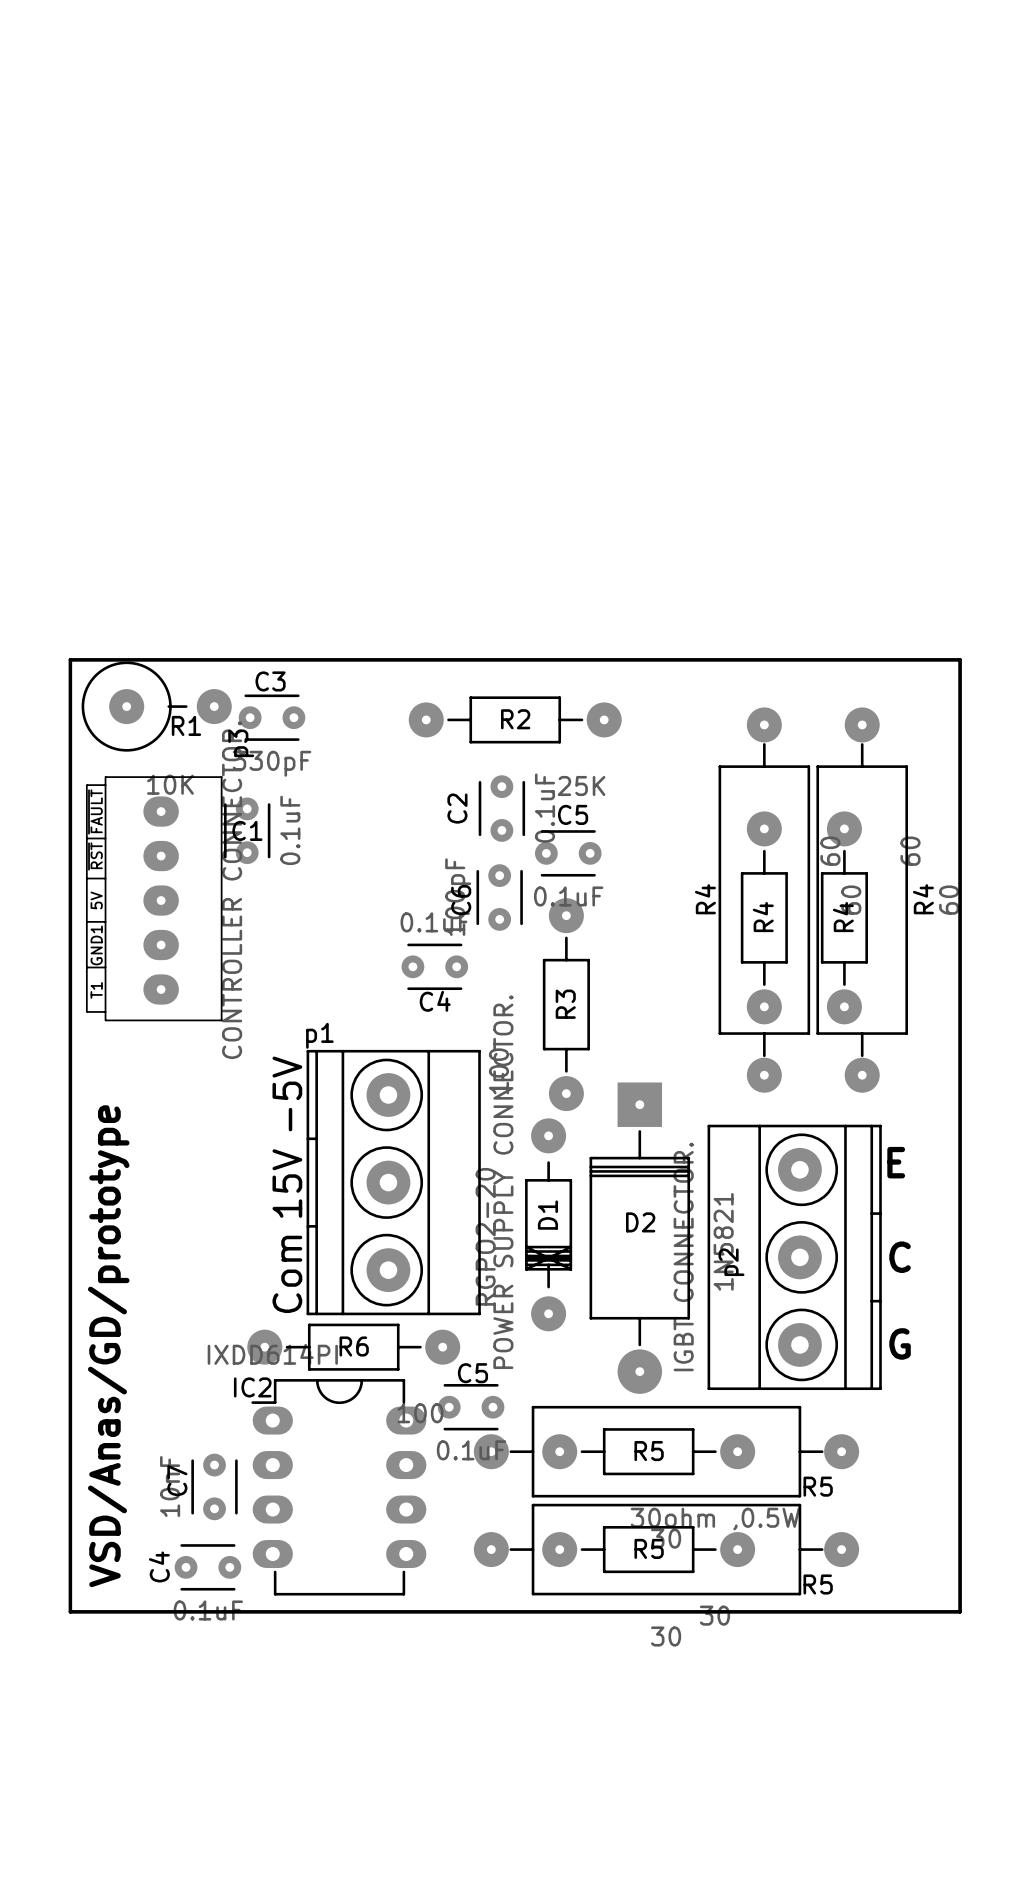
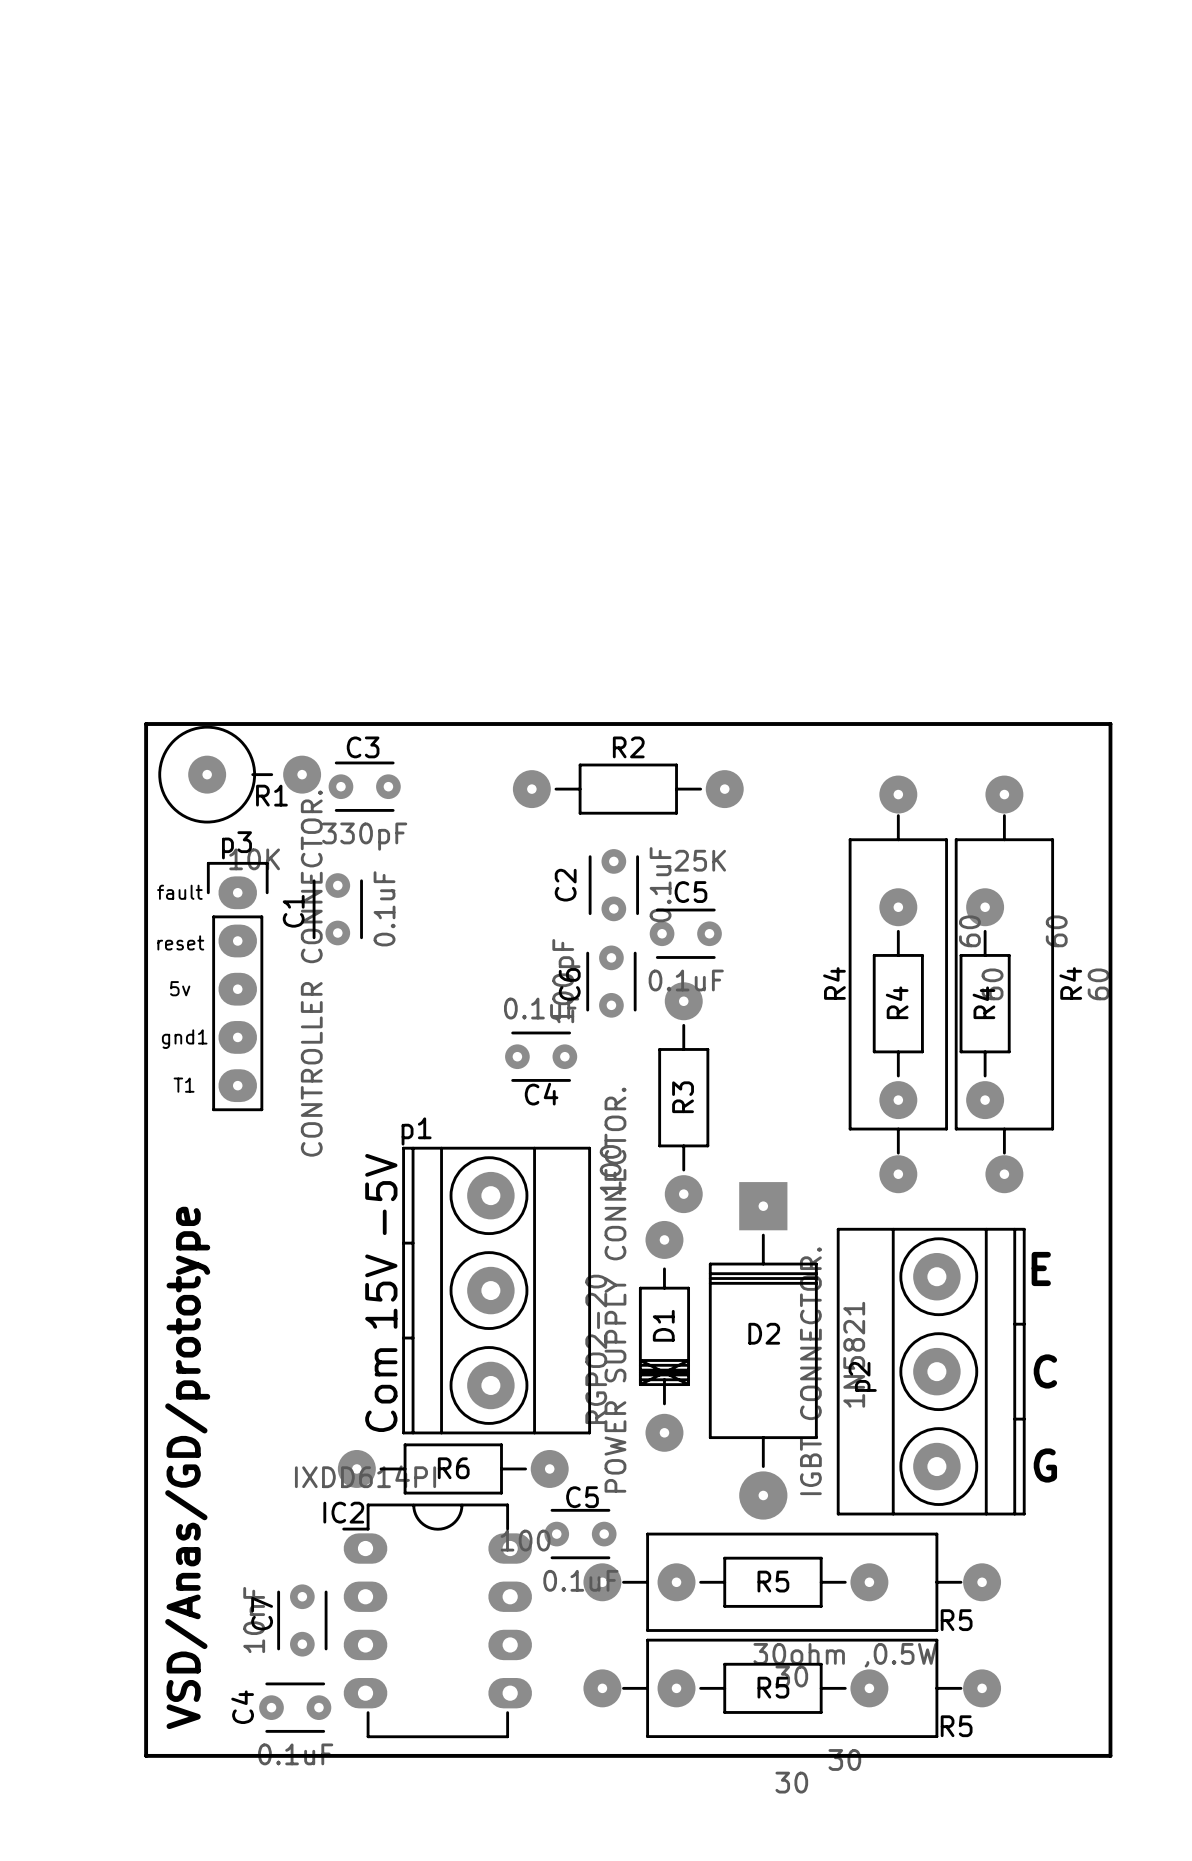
R2 name position: R2 (515, 719) -> R2 (628, 747)
p3 name position: p3 (241, 743) -> p3 (236, 845)
p3 footprint: [85, 776, 223, 1022] -> [206, 861, 269, 1112]
text: none -> fault (179, 892)
C1 name rotation: 0° (247, 830) -> 90° counterclockwise (293, 911)
text: none -> reset (180, 942)
text: none -> 5v (180, 988)
text: none -> gnd1 (184, 1039)
text: none -> T1 (184, 1085)

